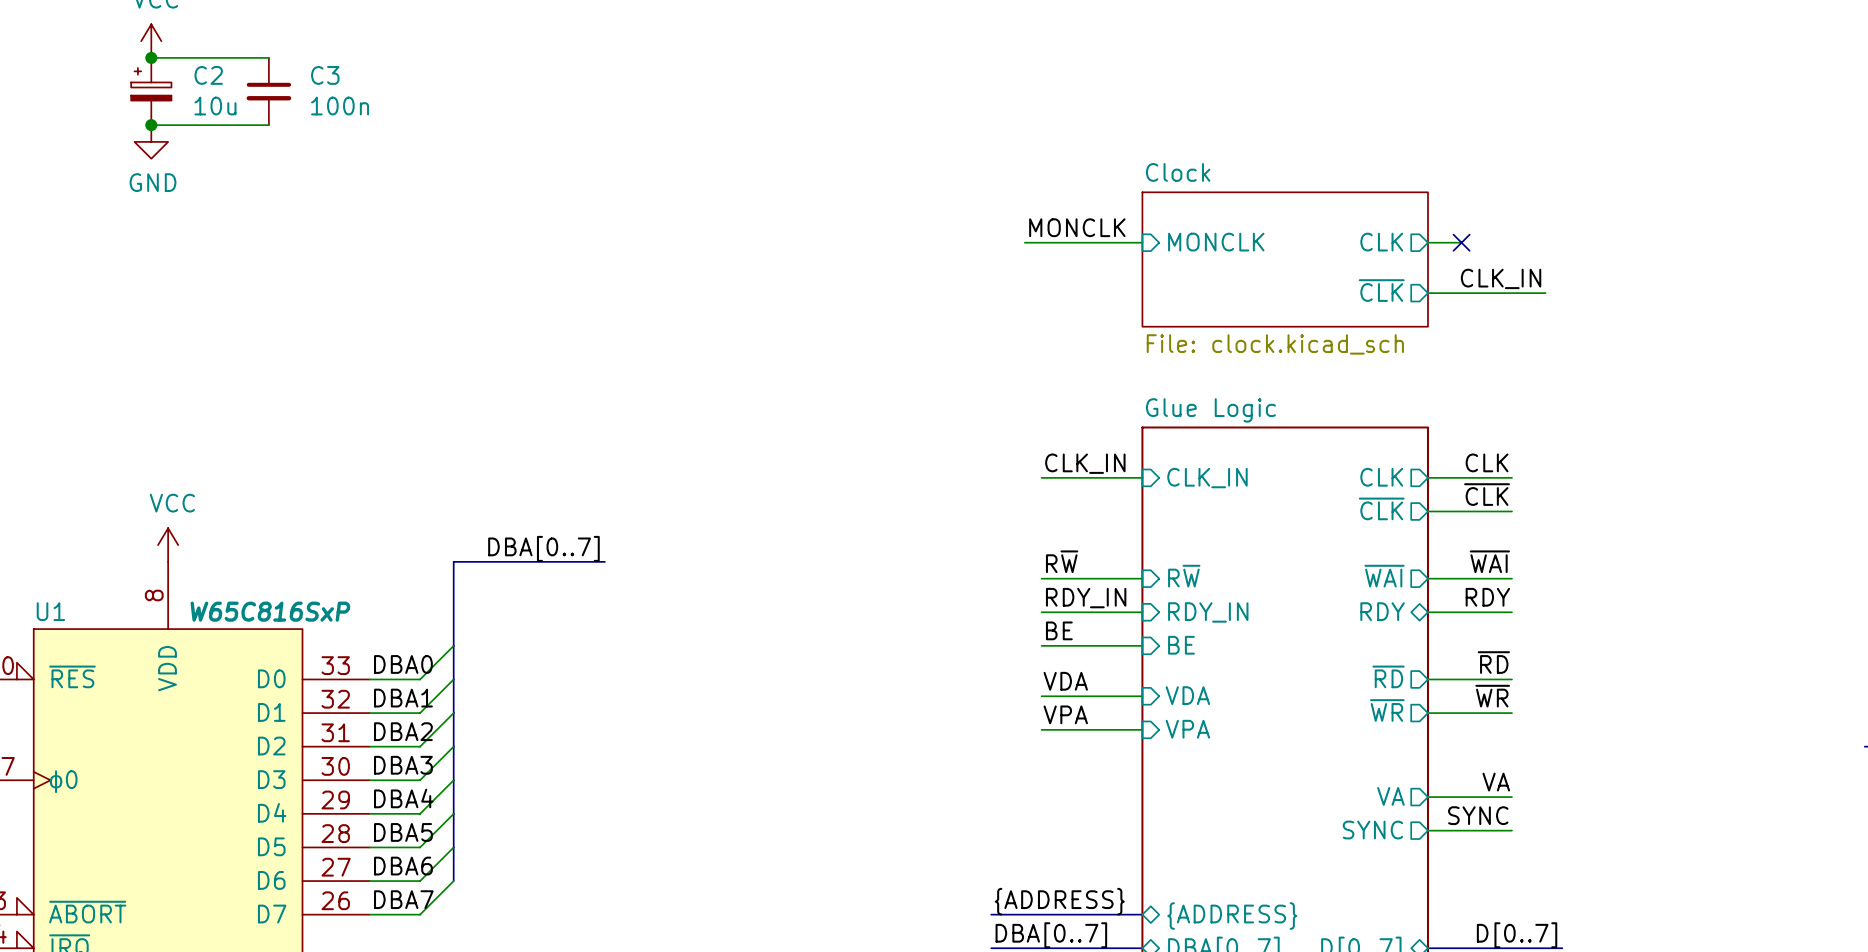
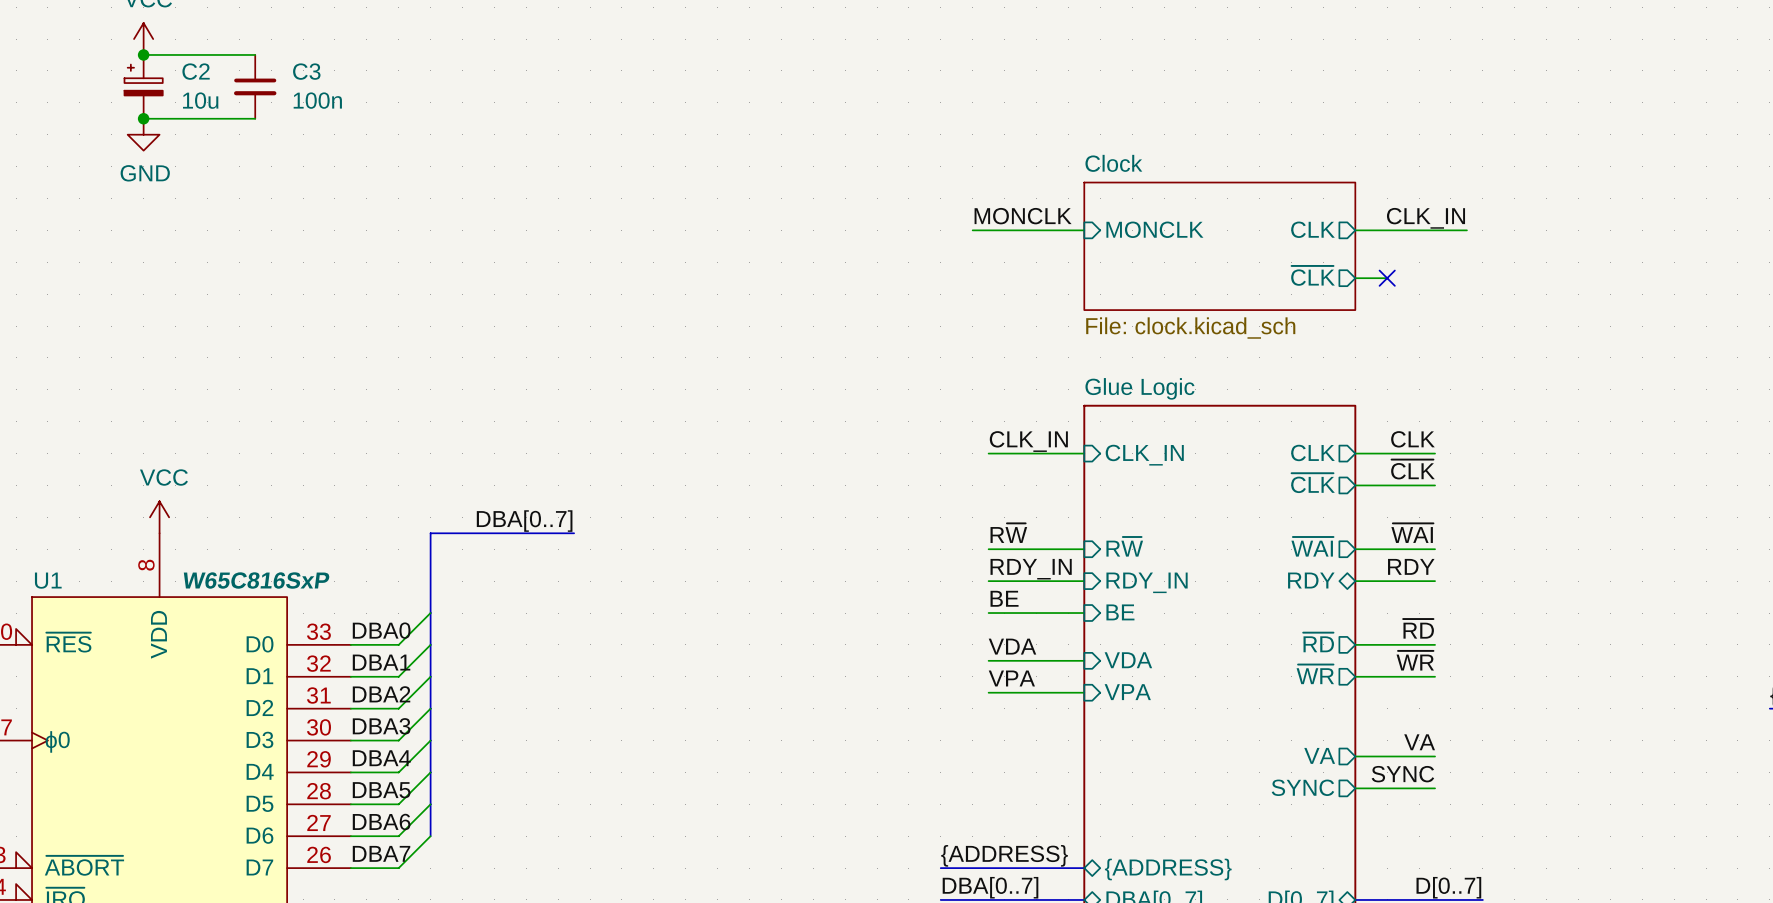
no-connect mark position: (1461, 242) -> (1387, 278)
label position: CLK_IN (1501, 278) -> CLK_IN (1426, 218)
wire: (1461, 293) (1545, 293) -> (1387, 230) (1466, 230)

